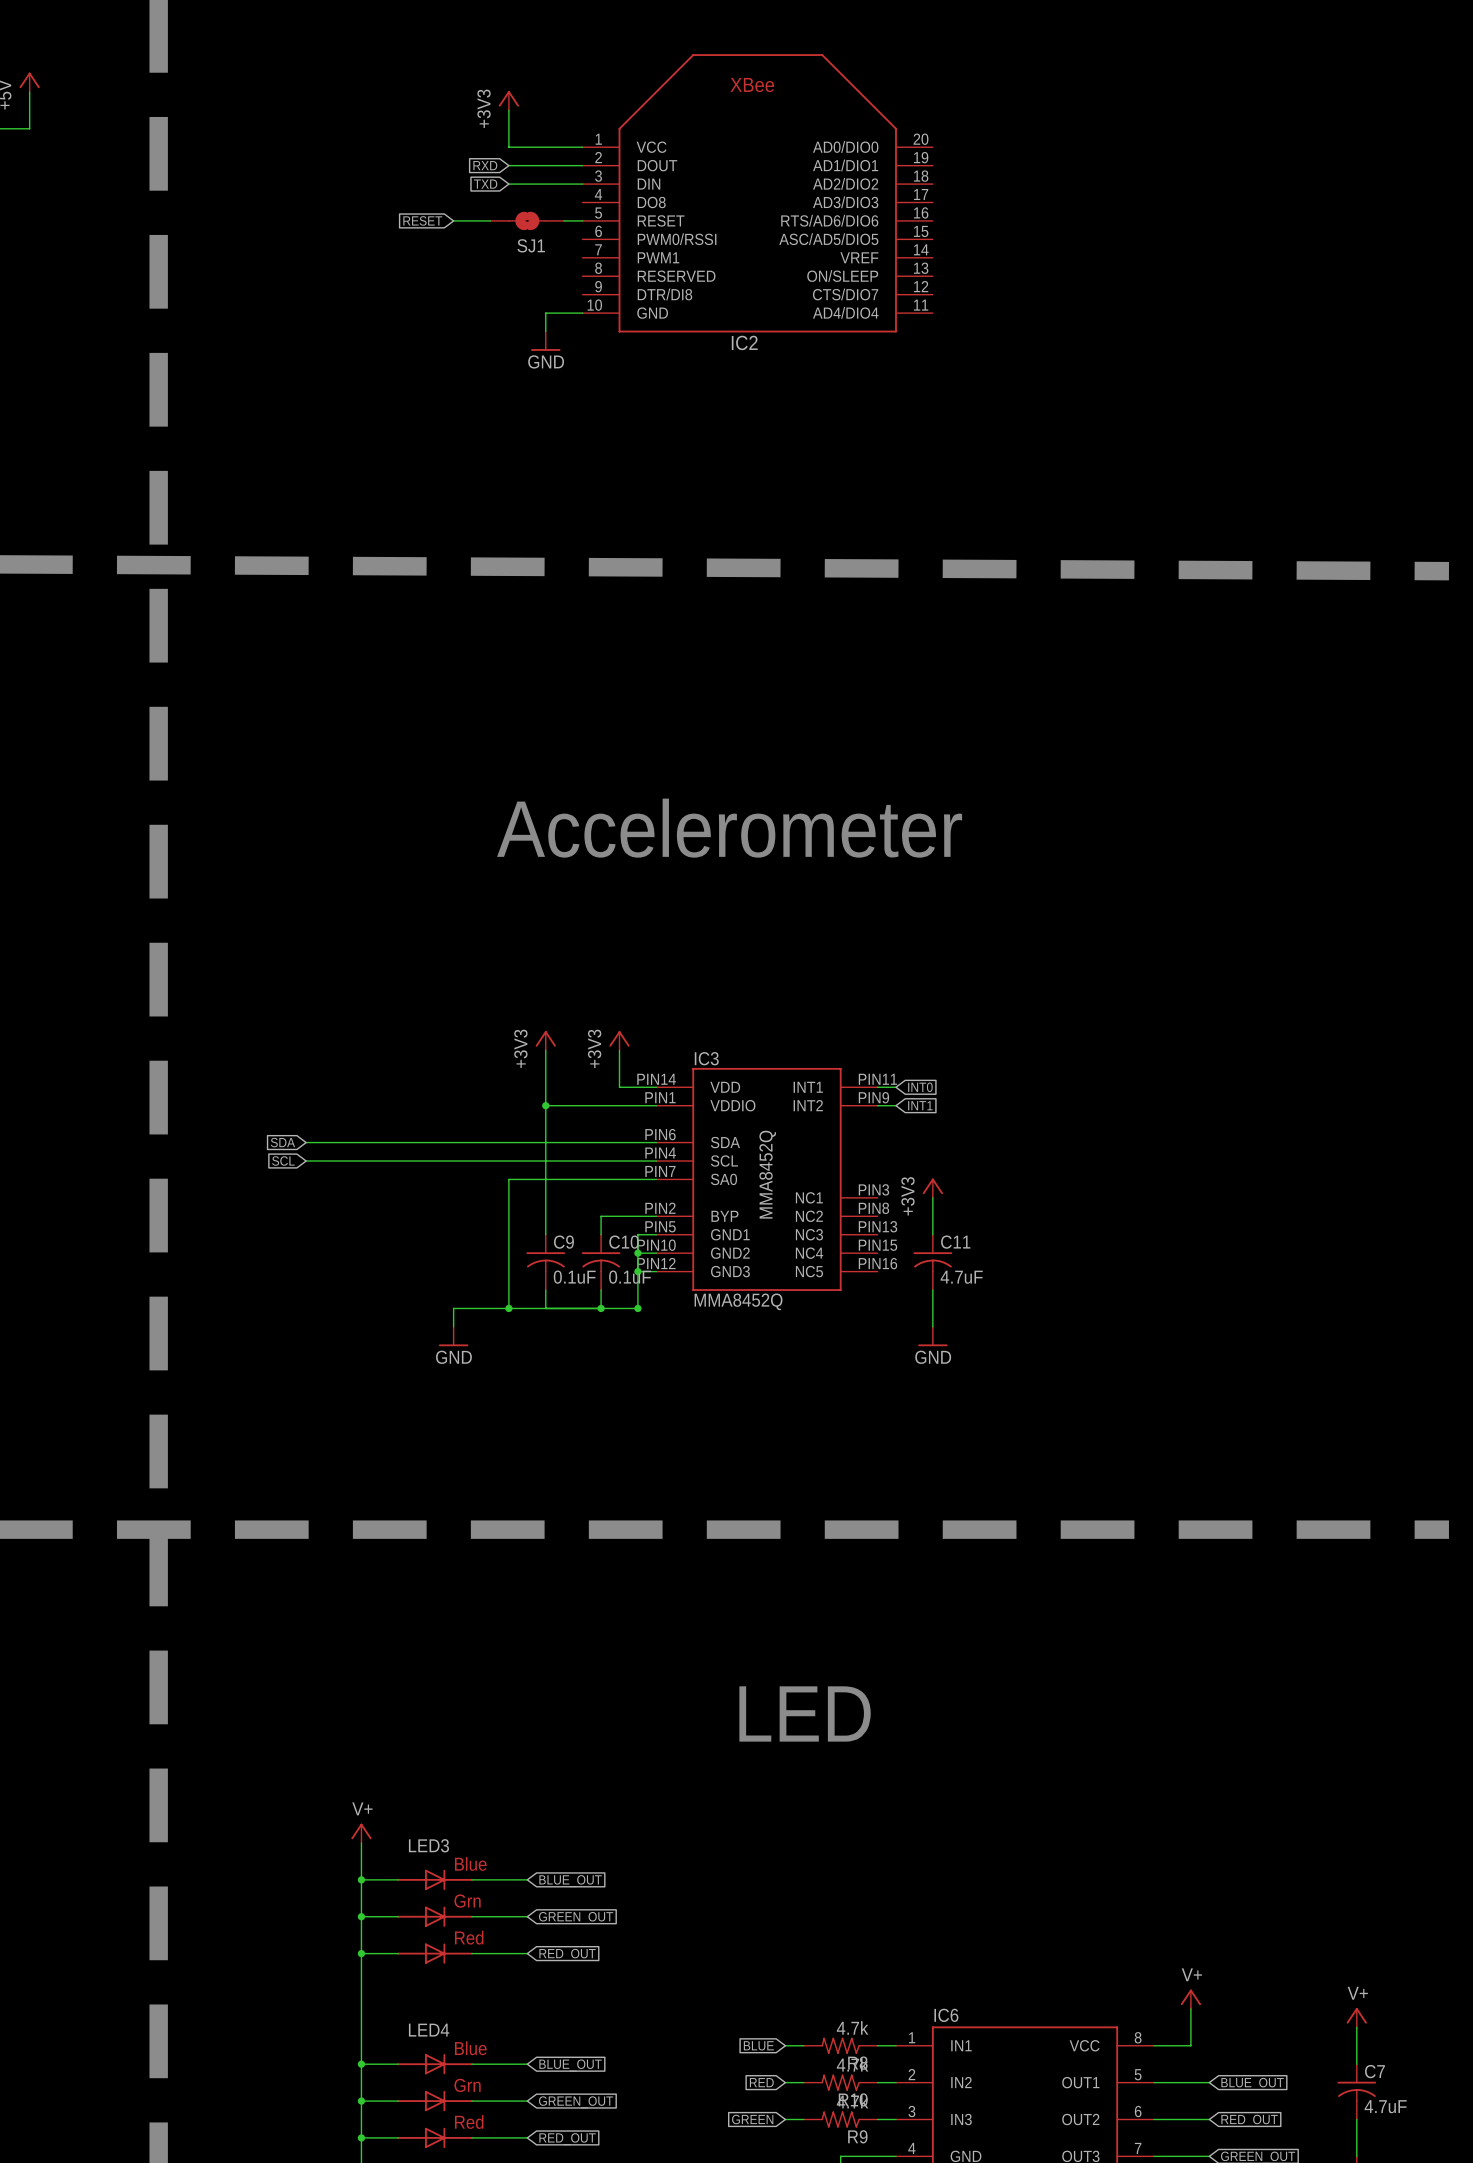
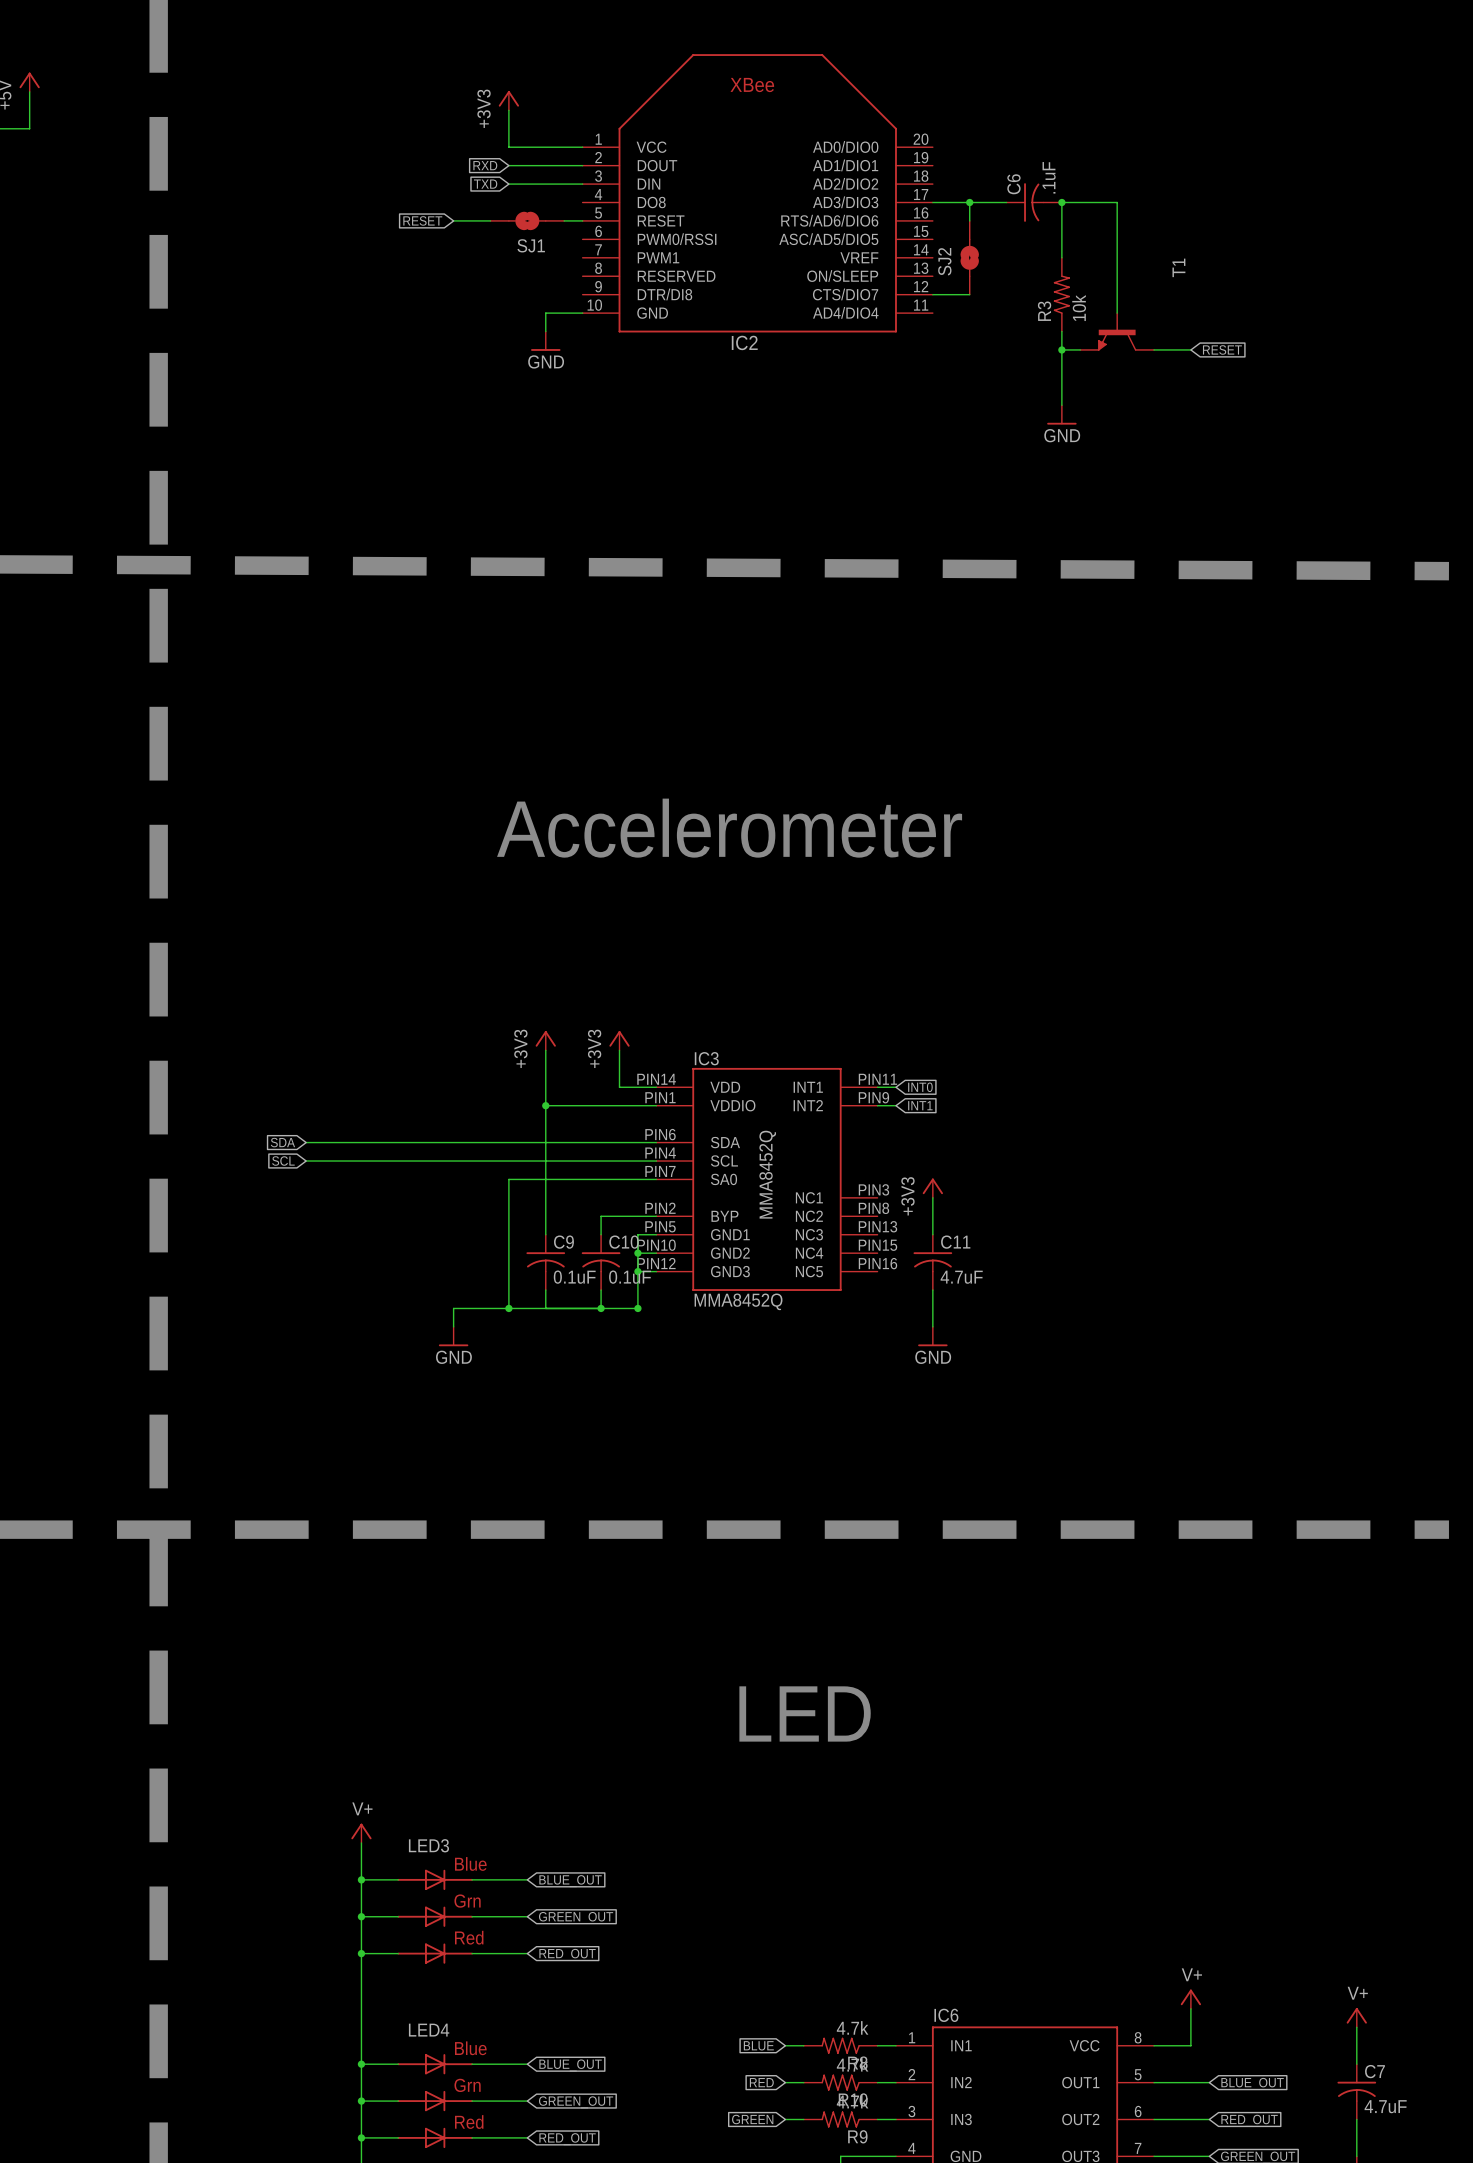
wire: none -> (932, 202) (1006, 202)
wire: none -> (969, 202) (969, 220)
junction: none -> (969, 202)
C6: none -> .1uF (1034, 202)
junction: none -> (1061, 202)
SJ2: none -> (969, 257)
wire: none -> (1061, 257) (1061, 202) (1117, 202) (1117, 313)
wire: none -> (932, 294) (969, 294)
R3: none -> 10k (1061, 294)
wire: none -> (1061, 331) (1061, 405)
T1: none -> (1117, 331)
wire: none -> (1061, 349) (1080, 349)
junction: none -> (1061, 349)
wire: none -> (1154, 349) (1190, 349)
global label: none -> RESET (1222, 349)
power symbol: none -> GND (1061, 414)

